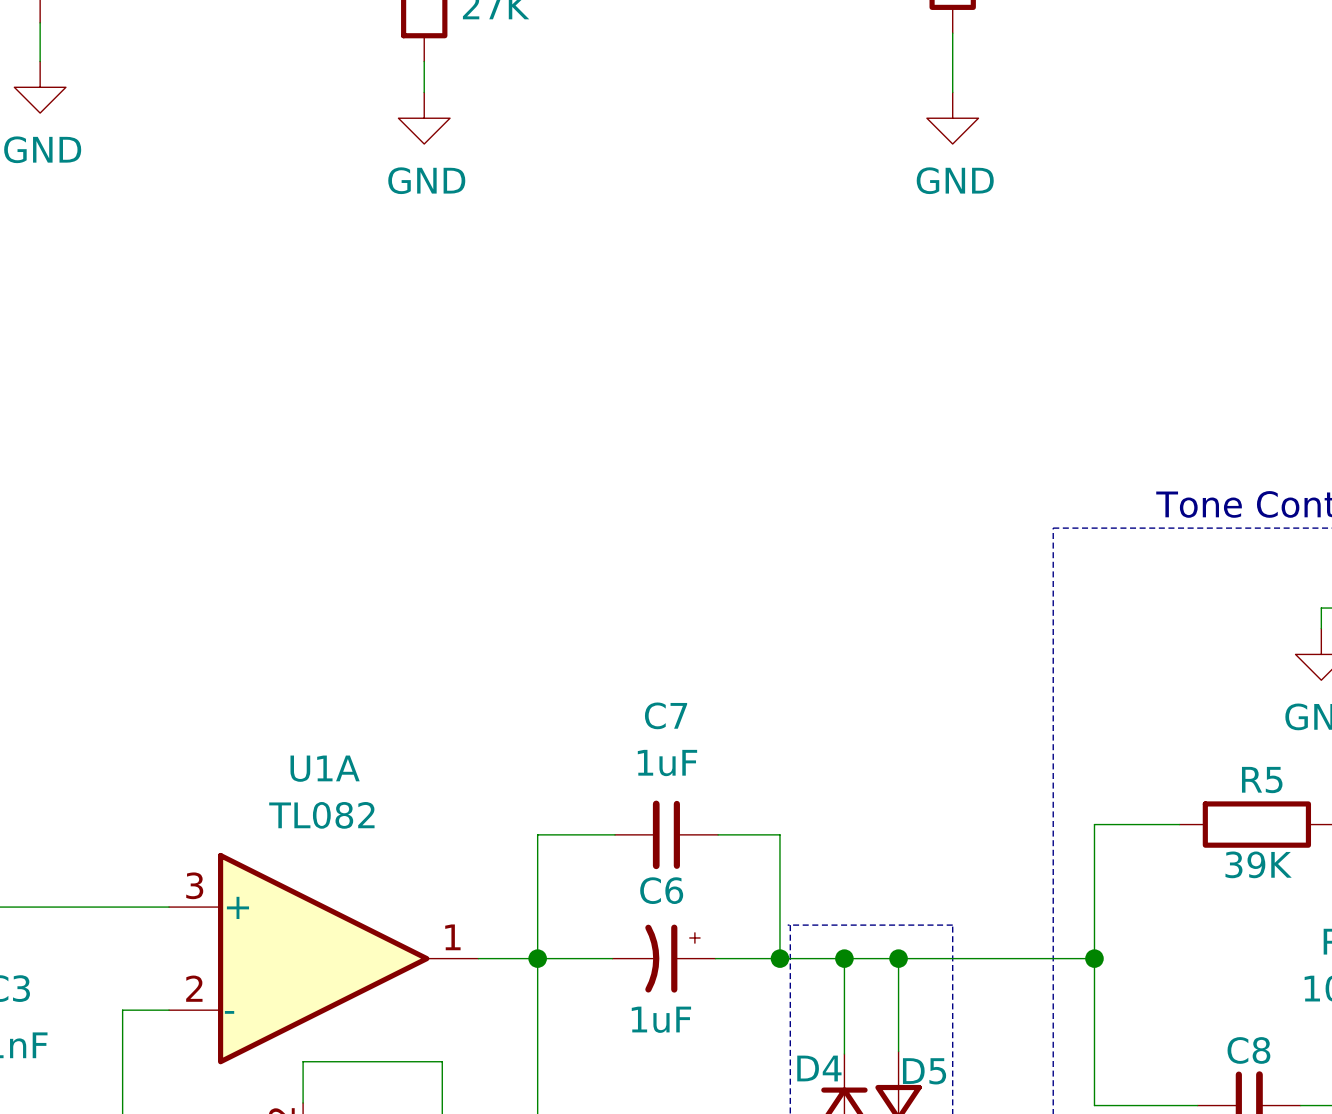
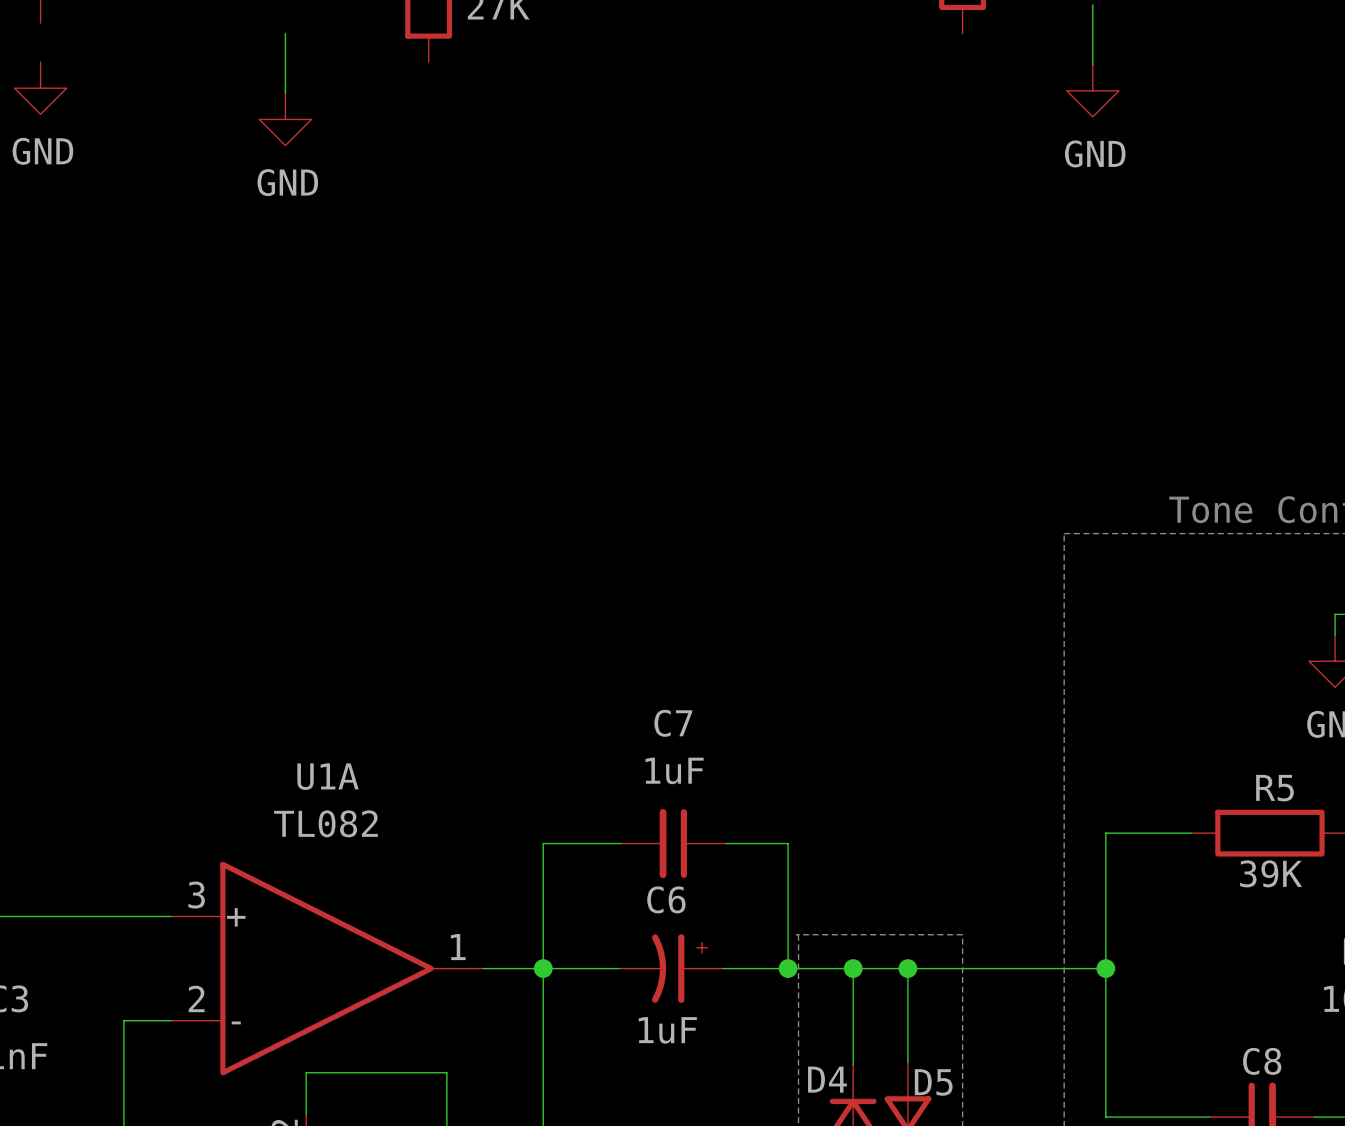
wire: (40, 22) (40, 61) -> none
wire: none -> (285, 33) (285, 93)
wire: (952, 33) (952, 92) -> (1092, 4) (1092, 64)
wire: (424, 61) (424, 92) -> none
power symbol position: GND (424, 118) -> GND (285, 119)
power symbol position: GND (952, 118) -> GND (1092, 90)

